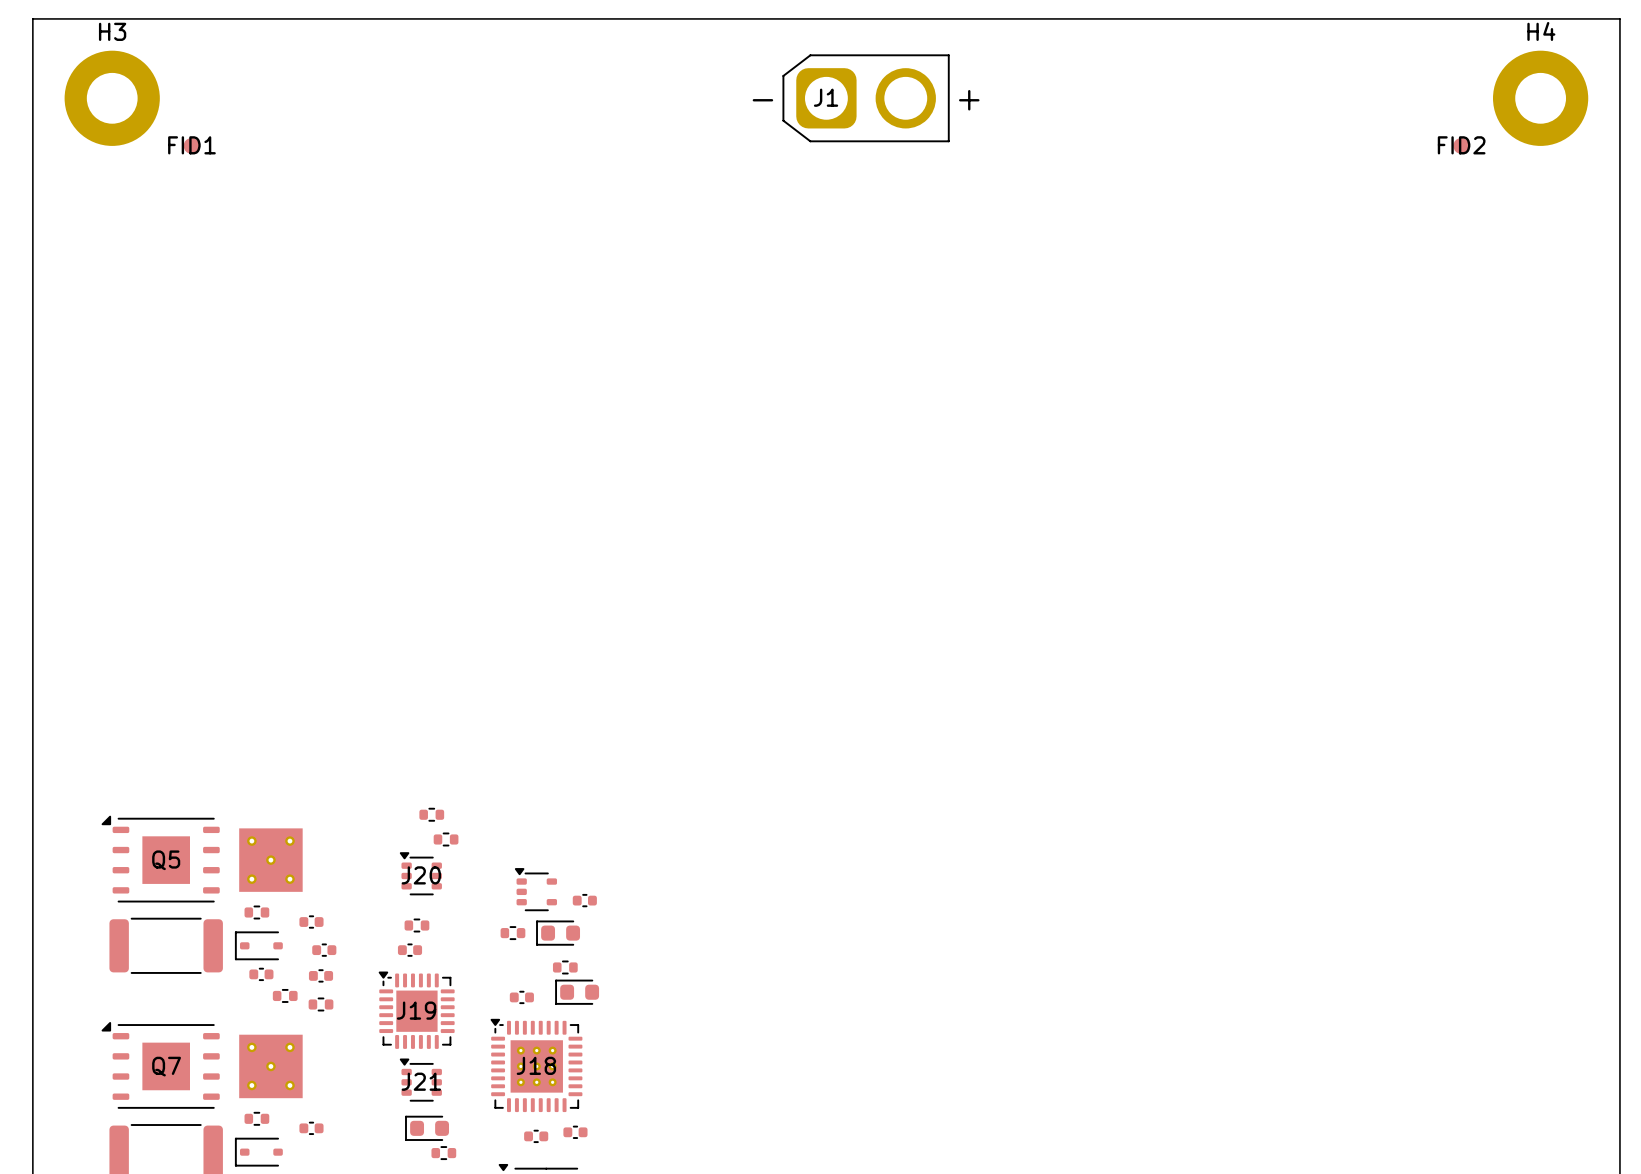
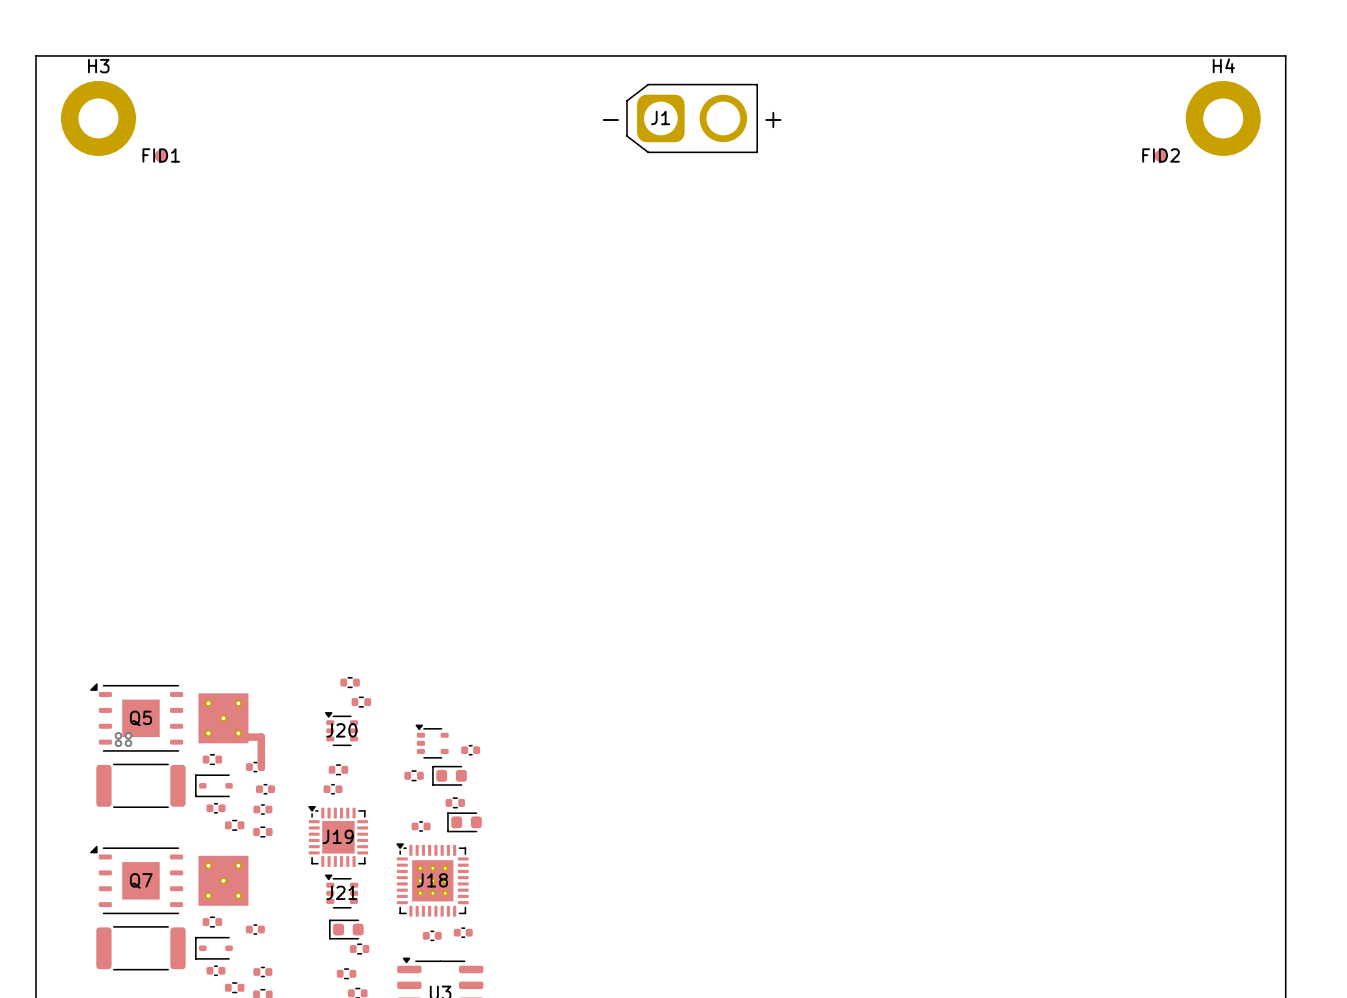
via: none -> (118, 735)
via: none -> (128, 735)
track: none -> (235, 737) (261, 737) (261, 767)
via: none -> (118, 743)
via: none -> (128, 743)

